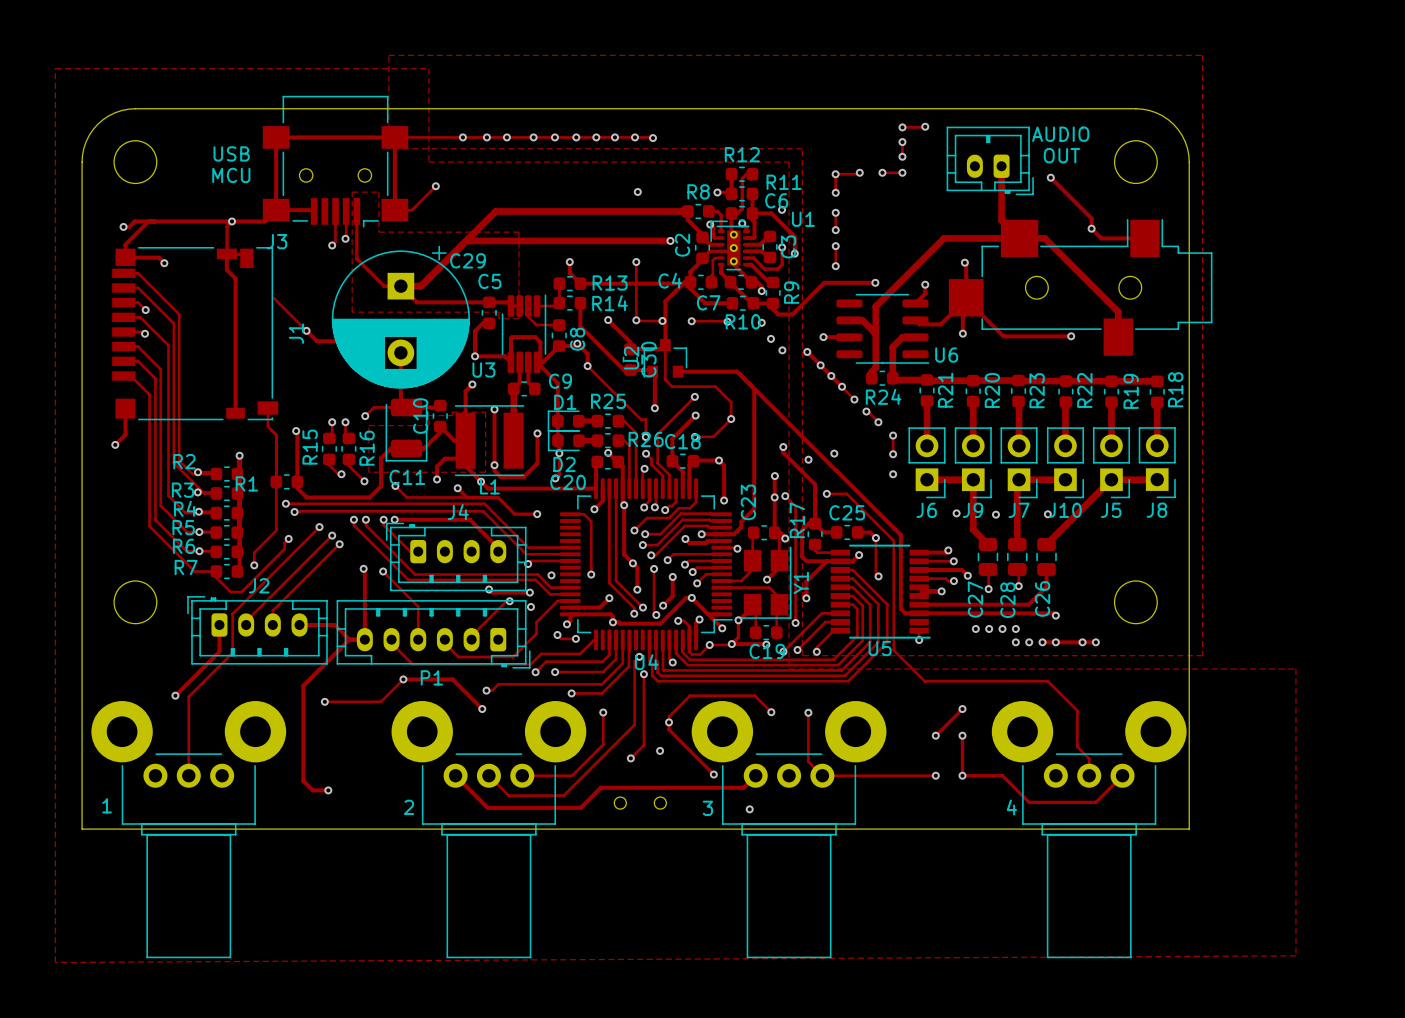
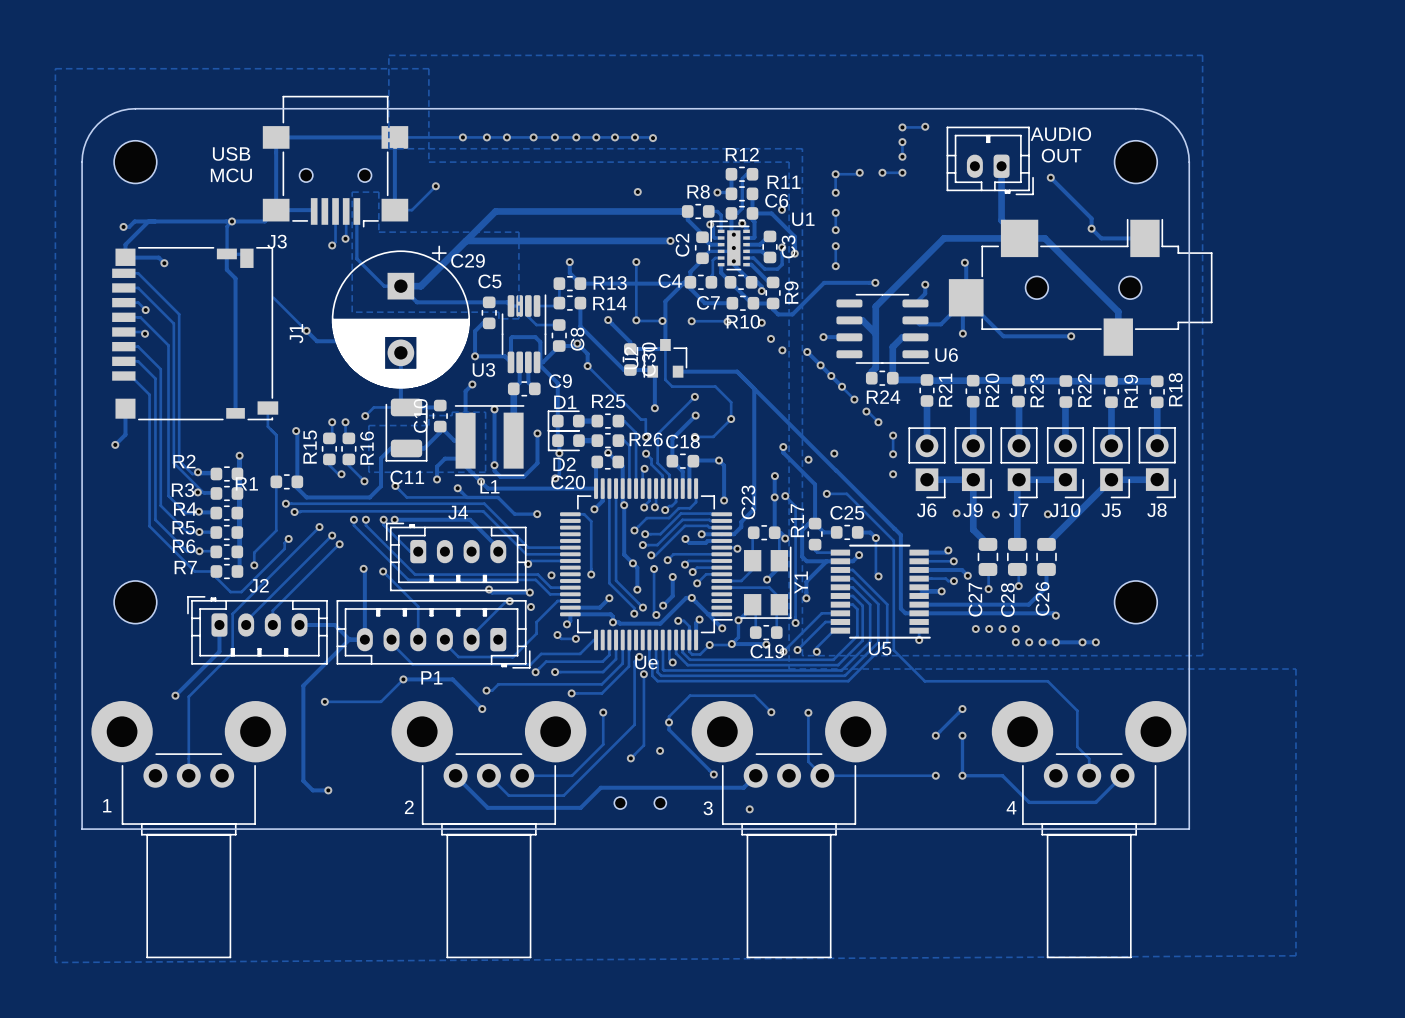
U4 name: U4 (646, 662) -> Ue (646, 662)

